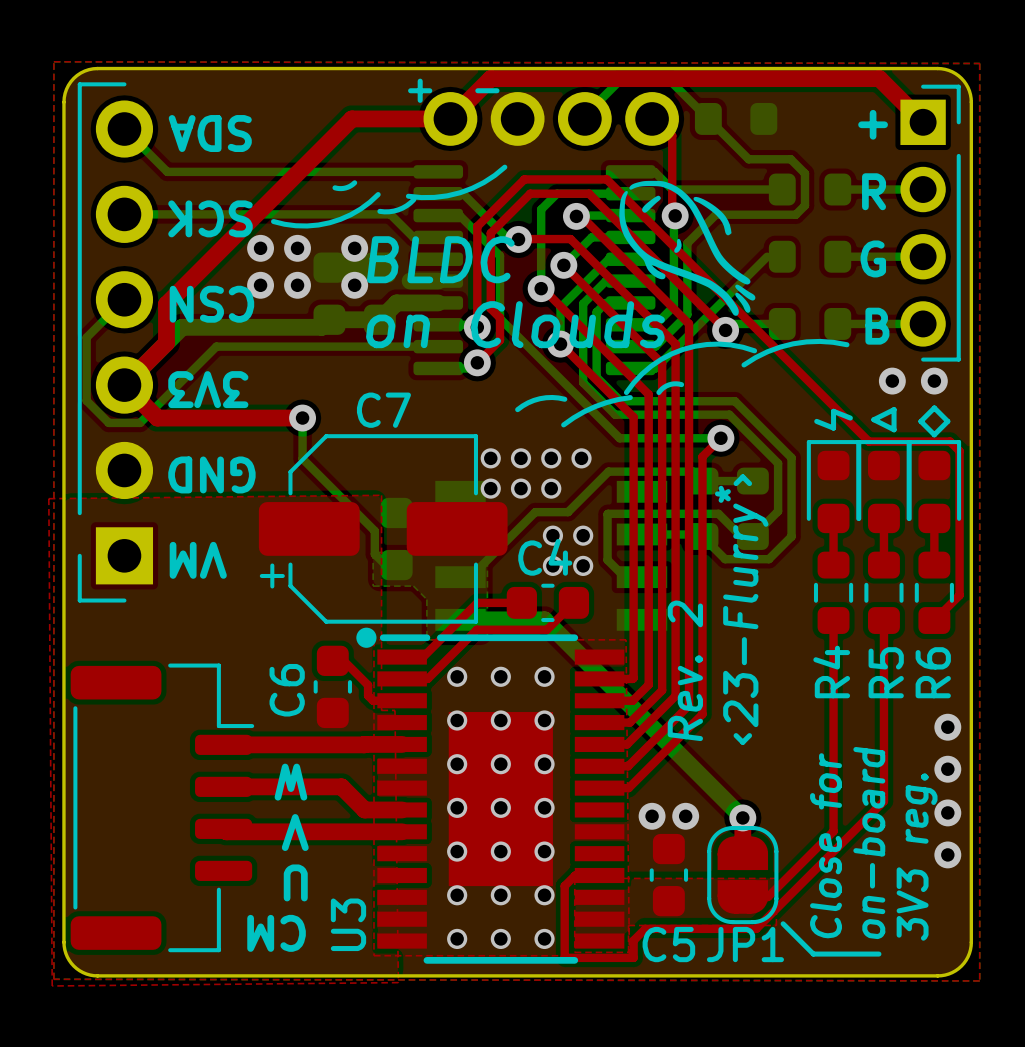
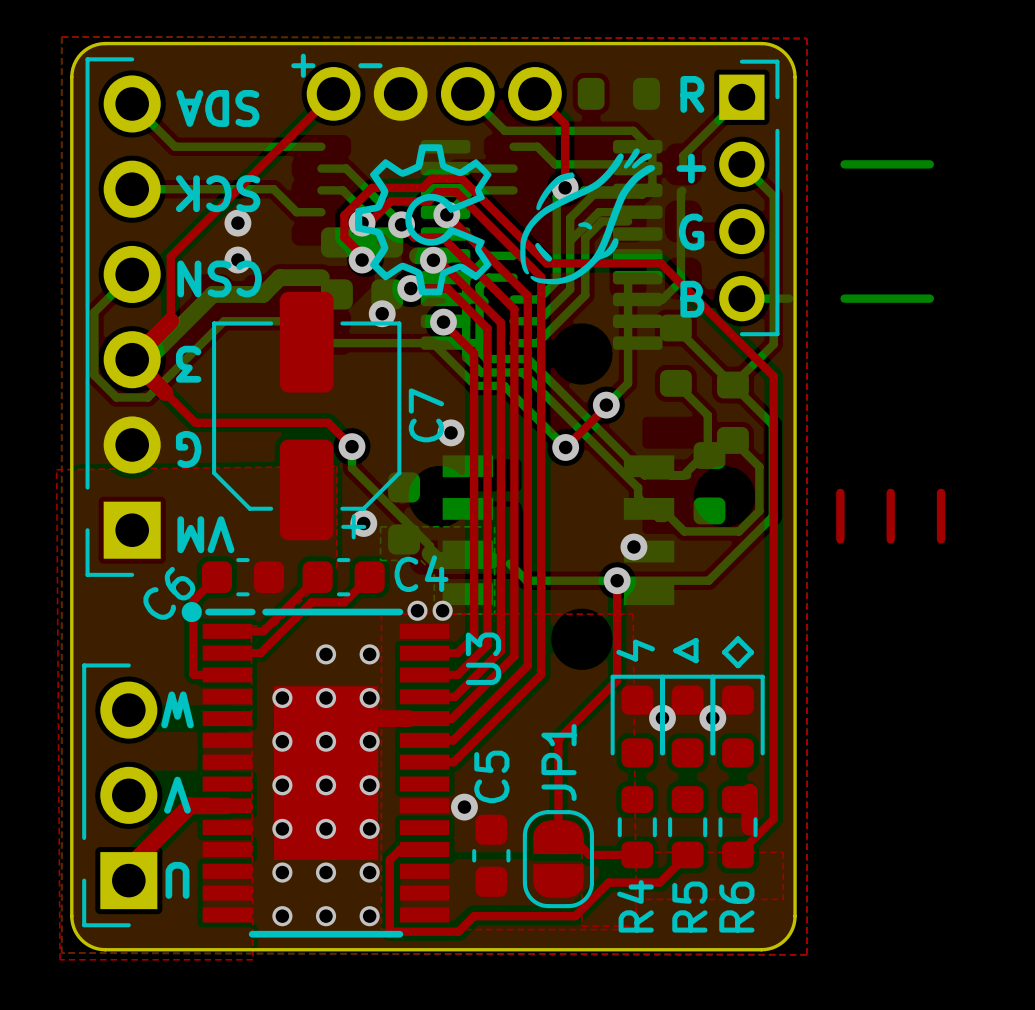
top zone outline: (53, 61) (979, 63) (979, 980) (53, 979) -> (61, 36) (806, 38) (806, 954) (61, 953)
board edge: (754, 68) (941, 68) (955, 73) (964, 81) (969, 91) (971, 102) (970, 949) (961, 966) (952, 972) (941, 975) (754, 975) -> (761, 43) (772, 45) (785, 53) (791, 62) (795, 77) (795, 916) (791, 930) (785, 939) (776, 946) (761, 949)
bottom track: (584, 115) (618, 81) (671, 81) (748, 159) (790, 159) (804, 173) (804, 205) (795, 214) (715, 214) (687, 243) (687, 314) (655, 346) (630, 346) -> none
top track: (652, 115) (672, 135) (672, 212) (675, 215) -> none
bottom track: none -> (467, 93) (504, 130) (633, 130) (652, 150) (652, 184) (642, 194) (593, 194) (570, 218) (570, 289) (538, 321) (513, 321)
top track: none -> (534, 93) (565, 124) (565, 187)
part position: (551, 118) -> (434, 93)
part: none -> (618, 93)
part: (736, 118) -> none
bottom track: none -> (741, 97) (683, 155) (683, 164)
top track: (923, 122) (879, 78) (490, 78) (450, 118) (351, 118) (166, 304) (166, 343) (163, 346) -> (333, 93) (170, 256) (170, 321)
text position: + (873, 124) -> + (691, 168)
line: (504, 167) (483, 182) (459, 192) (434, 197) (408, 196) -> none
drawing: none -> [355, 144, 656, 296]
bottom track: (313, 171) (438, 171) -> none
bottom track: none -> (513, 146) (537, 146) (555, 164) (628, 164)
bottom track: (630, 171) (654, 171) (672, 189) (782, 189) -> none
drawing: [619, 180, 756, 316] -> none
line: (354, 182) (345, 188) (334, 187) -> none
bottom track: none -> (741, 164) (773, 196) (773, 344) (732, 385)
part: (810, 189) -> none
text position: R (874, 191) -> R (692, 94)
bottom track: none -> (321, 168) (346, 168) (401, 224)
bottom track: (463, 193) (508, 239) (518, 239) -> (470, 168) (513, 168)
bottom track: (630, 193) (556, 193) (541, 209) (541, 288) -> none
line: (378, 194) (350, 214) (329, 222) (295, 225) (273, 221) -> none
line: (413, 199) (398, 209) (379, 211) -> none
bottom track: none -> (565, 187) (556, 196) (556, 281) (538, 299) (513, 299)
bottom track: (266, 214) (390, 214) (413, 237) (438, 237) -> (273, 189) (296, 212) (321, 212)
bottom track: none -> (321, 190) (342, 190) (367, 214) (367, 224)
bottom track: (438, 215) (459, 215) (500, 255) (500, 318) (619, 438) (720, 438) -> none
bottom track: none -> (513, 190) (471, 190) (446, 214)
via: (675, 215) -> none
top track: (576, 216) (581, 216) (653, 288) -> (550, 263) (660, 263)
via position: (576, 216) -> (565, 187)
part position: (930, 223) -> (749, 197)
top track: (518, 239) (570, 239) (675, 344) (675, 695) (627, 744) (599, 744) -> none
via: (518, 239) -> none
top track: none -> (446, 214) (527, 295) (527, 665) (453, 740) (424, 740)
via: none -> (446, 214)
bottom track: none -> (628, 221) (602, 221) (585, 238) (585, 295) (537, 343) (513, 343)
via: none -> (237, 223)
via: (260, 248) -> none
via: (297, 248) -> none
top track: none -> (367, 224) (390, 201) (428, 201) (437, 192) (456, 192) (541, 277) (541, 674) (453, 762) (424, 762)
top track: none -> (401, 224) (414, 237) (442, 237) (514, 309) (514, 656) (452, 718) (424, 718)
via: none -> (401, 224)
bottom track: (767, 256) (655, 368) (630, 368) -> none
part: (810, 256) -> none
bottom track: (837, 256) (923, 256) -> none
text position: G (873, 258) -> G (691, 232)
text: BLDC (440, 259) -> none
bottom track: (630, 259) (608, 259) (560, 307) (560, 344) -> none
top track: (563, 265) (662, 363) (662, 690) (629, 722) (599, 722) -> none
via: (563, 265) -> none
bottom track: none -> (513, 255) (488, 255) (466, 278) (466, 357) (481, 372) (522, 372) (638, 487) (638, 497) (658, 517) (664, 517)
bottom track: (630, 281) (605, 281) (583, 303) (583, 382) (615, 414) (729, 414) (778, 463) (778, 511) (752, 536) (741, 536) (718, 513) (608, 513) (607, 560) (624, 577) (641, 577) -> none
top track: none -> (365, 258) (344, 237) (344, 215) (372, 187) (422, 187) (431, 178) (461, 178) (548, 263)
via: none -> (237, 260)
via: (260, 285) -> none
via: (297, 285) -> none
top track: none -> (433, 260) (438, 260) (500, 322) (500, 650) (454, 696) (424, 696)
via: none -> (433, 260)
via: (541, 288) -> none
top track: (542, 288) (648, 394) (648, 684) (632, 700) (599, 700) -> none
bottom track: none -> (321, 277) (279, 277) (263, 294) (212, 294) (147, 359) (137, 359)
bottom track: (438, 302) (396, 302) (379, 319) (329, 319) (321, 327) (182, 327) (124, 385) -> none
bottom track: none -> (513, 277) (488, 277) (479, 286) (479, 351) (486, 359) (528, 359) (644, 475) (687, 475)
bottom track: (630, 302) (605, 302) (596, 312) (596, 377) (620, 401) (734, 401) (791, 457) (791, 536) (768, 559) (725, 559) (700, 534) (641, 534) -> none
bottom track: none -> (628, 278) (628, 383) (606, 405)
top track: none -> (410, 288) (447, 288) (487, 328) (487, 645) (457, 674) (424, 674)
via: none -> (410, 288)
top track: (689, 323) (689, 705) (628, 766) (599, 766) -> (696, 298) (773, 376) (773, 819) (738, 854)
part: (810, 323) -> none
text: on Clouds (515, 324) -> none
text position: B (877, 326) -> B (692, 299)
top track: (477, 327) (477, 226) (524, 179) (606, 179) (868, 441) (950, 441) (959, 451) (959, 595) (934, 620) -> none
via: (477, 327) -> none
top track: (725, 330) (589, 193) (530, 193) (490, 233) (490, 308) (500, 317) (500, 340) (477, 362) -> none
via: (725, 330) -> none
via: none -> (382, 313)
top track: (560, 344) (633, 417) (633, 678) (599, 678) -> none
via: (560, 344) -> none
line: (846, 344) (820, 341) (793, 343) (767, 351) (744, 364) -> none
bottom track: (313, 346) (438, 346) -> none
via: none -> (443, 322)
line: (754, 350) (719, 344) (683, 349) (651, 366) (626, 392) -> none
bottom track: none -> (675, 327) (772, 424) (772, 516) (708, 580) (526, 580) (509, 563)
via: (477, 362) -> none
bottom track: none -> (321, 343) (432, 343) (475, 385) (504, 385) (565, 447)
part: none -> (675, 355)
via: (892, 381) -> none
via: (934, 381) -> none
line: (681, 384) (668, 384) (658, 392) -> none
text: 3V3 (208, 389) -> 3 (188, 364)
line: (630, 397) (595, 406) (563, 424) -> none
line: (564, 399) (539, 398) (517, 409) -> none
line: (934, 407) (920, 421) (934, 434) (947, 421) (934, 407) -> (738, 638) (724, 652) (738, 665) (751, 652) (738, 638)
bottom track: none -> (675, 383) (707, 415) (707, 451) (683, 475)
line: (894, 409) (894, 429) (873, 419) (894, 409) -> (696, 640) (696, 660) (675, 650) (696, 640)
C7 name position: C7 (383, 410) -> C7 (426, 415)
top track: (157, 418) (302, 418) -> (165, 392) (195, 422) (328, 422) (352, 446)
bottom track: (302, 418) (302, 458) (374, 531) (374, 554) (385, 565) (396, 565) -> none
via: (302, 418) -> none
line: (850, 418) (833, 411) (833, 428) (816, 421) -> (652, 648) (635, 642) (635, 659) (618, 652)
top track: none -> (606, 405) (565, 447)
via: none -> (606, 405)
top track: (720, 438) (702, 456) (702, 714) (628, 788) (599, 788) -> none
via: (720, 438) -> none
part: none -> (732, 412)
via: none -> (451, 432)
via: (490, 458) -> none
via: (521, 458) -> none
via: (551, 458) -> none
via: (581, 458) -> none
bottom track: none -> (732, 440) (759, 466) (759, 511) (738, 531) (684, 531) (670, 517)
bottom track: none -> (352, 446) (352, 468) (430, 546) (430, 553) (436, 560) (491, 560)
via: none -> (352, 446)
via: none -> (565, 447)
text: GND (211, 474) -> G (188, 449)
bottom track: (752, 481) (702, 481) (693, 471) (608, 471) (568, 512) (535, 512) (470, 577) (460, 577) -> none
line: (736, 483) (742, 476) (749, 483) -> none
part: (833, 486) -> none
part: (883, 486) -> none
part: (934, 486) -> none
via: (490, 488) -> none
via: (521, 488) -> none
via: (551, 488) -> none
text: * (722, 494) -> none
top zone outline: (48, 498) (381, 495) (381, 710) (394, 710) (398, 982) (52, 985) -> (56, 473) (56, 469) (336, 466) (336, 567) (274, 625) (251, 625) (253, 959) (60, 959)
part: (752, 508) -> none
C7 rotation: 0° (383, 528) -> 90° counterclockwise (306, 416)
via: (552, 535) -> none
via: (583, 535) -> none
via: none -> (363, 523)
C4 name position: C4 (545, 557) -> C4 (421, 573)
via: (552, 565) -> none
via: (583, 565) -> none
via: none -> (633, 546)
R4 position: (833, 592) -> (637, 827)
R5 position: (883, 592) -> (687, 827)
R6 position: (934, 592) -> (738, 827)
top track: none -> (216, 577) (193, 600) (193, 674) (227, 674)
top track: none -> (317, 577) (263, 631) (227, 631)
top track: none -> (369, 577) (344, 602) (311, 602) (260, 653) (227, 653)
top track: (521, 602) (477, 602) (423, 657) (402, 657) -> none
C4 position: (547, 602) -> (343, 577)
top track: (573, 602) (547, 629) (476, 629) (427, 678) -> (443, 323) (474, 353) (474, 636) (457, 653) (435, 653)
top track: none -> (617, 580) (617, 680) (558, 739) (558, 837) (571, 837) (589, 854) (637, 854)
via: none -> (617, 580)
text: 23-Flurry (745, 615) -> none
bottom track: (460, 619) (544, 619) (742, 817) -> none
top track: (833, 620) (833, 831) (768, 896) (742, 896) -> none
top track: (883, 620) (883, 801) (756, 928) (645, 928) (633, 940) (633, 957) (565, 957) (564, 886) (575, 875) (599, 875) -> none
via: none -> (417, 610)
via: none -> (442, 610)
top track: (339, 660) (343, 660) (368, 685) (368, 695) (373, 700) (402, 700) -> none
text: Rev. 2 (685, 670) -> none
via: (457, 676) -> none
via: (500, 676) -> none
via: (544, 676) -> none
via: none -> (326, 654)
via: none -> (369, 654)
C6 rotation: 0° (332, 686) -> 90° clockwise (242, 577)
C6 position: (332, 686) -> (242, 577)
via: (457, 720) -> none
via: (500, 720) -> none
via: (544, 720) -> none
via: none -> (282, 698)
via: none -> (326, 698)
via: none -> (369, 698)
via: (947, 727) -> none
line: (736, 735) (742, 742) (749, 735) -> none
top track: (223, 744) (364, 744) -> none
via: none -> (662, 718)
via: none -> (712, 718)
part: none -> (637, 721)
part: none -> (687, 721)
part: none -> (738, 721)
via: (457, 764) -> none
via: (500, 764) -> none
via: (544, 764) -> none
via: none -> (282, 741)
via: none -> (326, 741)
via: none -> (369, 741)
via: (947, 769) -> none
text position: W (290, 782) -> W (177, 709)
top track: (223, 786) (341, 786) (364, 809) (402, 809) -> none
U3 position: (490, 795) -> (315, 769)
part: (162, 807) -> none
via: (457, 807) -> none
via: (500, 807) -> none
via: (544, 807) -> none
via: none -> (282, 785)
via: none -> (326, 785)
via: none -> (369, 785)
via: (947, 812) -> none
via: (652, 816) -> none
via: (685, 816) -> none
via: (742, 817) -> none
part: none -> (119, 795)
top track: (223, 828) (226, 831) (402, 831) -> none
top track: none -> (227, 805) (190, 805) (128, 867) (128, 880)
text position: V (295, 832) -> V (177, 795)
text: on-board (869, 843) -> none
text: Close for (826, 845) -> none
via position: (457, 851) -> (464, 807)
via: (500, 851) -> none
via: (544, 851) -> none
via: none -> (282, 828)
via: none -> (326, 828)
via: none -> (369, 828)
via: (947, 854) -> none
text: 3V3 reg. (917, 856) -> none
top track: none -> (424, 849) (400, 849) (389, 859) (390, 931) (458, 931) (474, 916) (575, 916) (608, 882) (659, 882) (687, 854)
C5 position: (668, 875) -> (491, 855)
JP1 position: (742, 875) -> (558, 859)
text position: U (295, 882) -> U (177, 880)
via: (457, 895) -> none
via: (500, 895) -> none
via: (544, 895) -> none
via: none -> (282, 872)
via: none -> (326, 872)
via: none -> (369, 872)
line: (783, 923) (813, 954) (878, 954) -> none
U3 name position: U3 (348, 924) -> U3 (483, 658)
text: CM (276, 933) -> none
via: (457, 938) -> none
via: (500, 938) -> none
via: (544, 938) -> none
via: none -> (282, 916)
via: none -> (326, 916)
via: none -> (369, 916)
C5 name rotation: 0° (668, 944) -> 90° counterclockwise (491, 776)
C5 name position: C5 (668, 944) -> C5 (491, 776)
JP1 name rotation: 0° (745, 944) -> 90° counterclockwise (558, 762)
JP1 name position: JP1 (745, 944) -> JP1 (558, 762)

